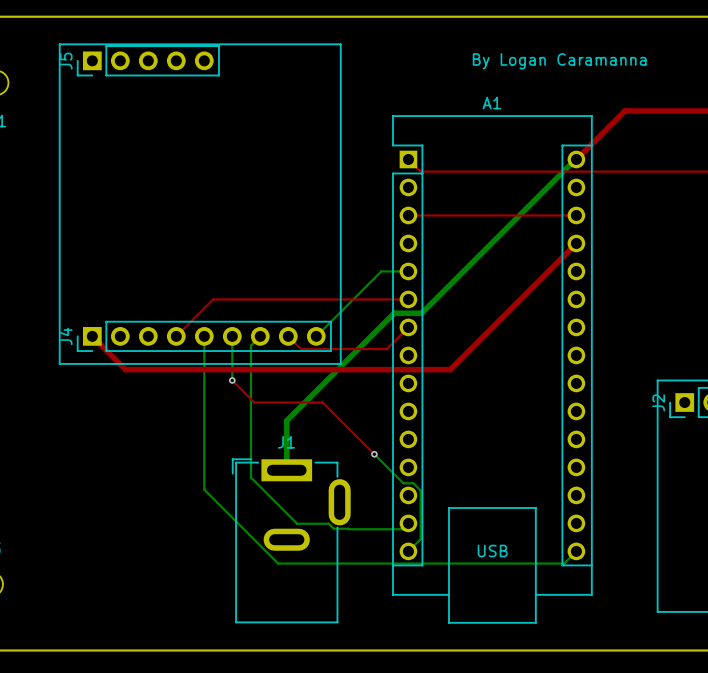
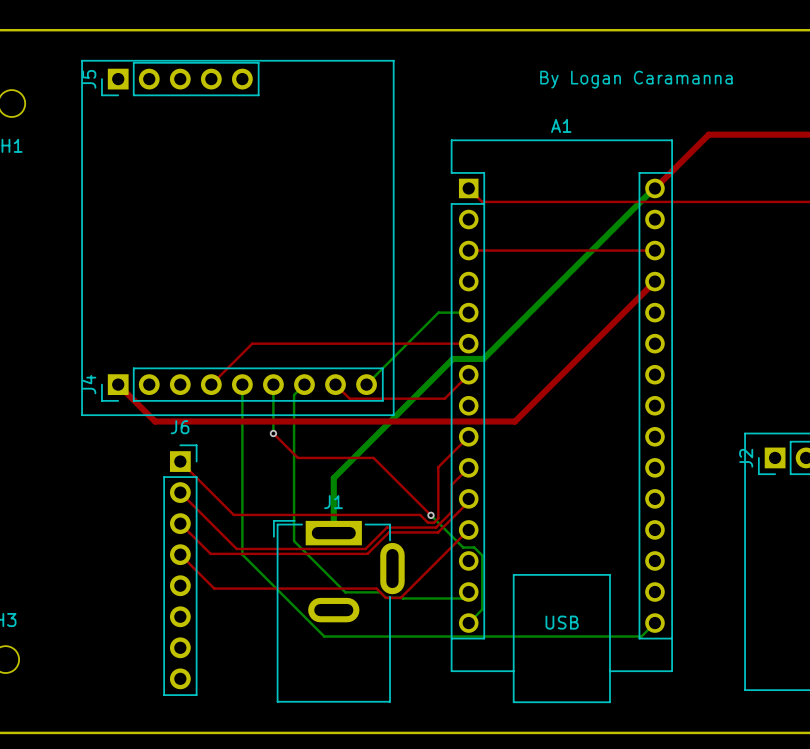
top track: none -> (468, 436) (438, 467) (438, 518) (434, 522) (427, 522) (420, 514) (233, 514) (180, 461)
top track: none -> (468, 467) (451, 484) (451, 511) (436, 527) (386, 527) (365, 548) (236, 548) (180, 492)
top track: none -> (468, 498) (468, 501) (438, 532) (389, 532) (367, 553) (210, 553) (180, 523)
top track: none -> (468, 529) (400, 597) (385, 597) (376, 588) (214, 588) (180, 554)
J6: none -> (180, 570)

